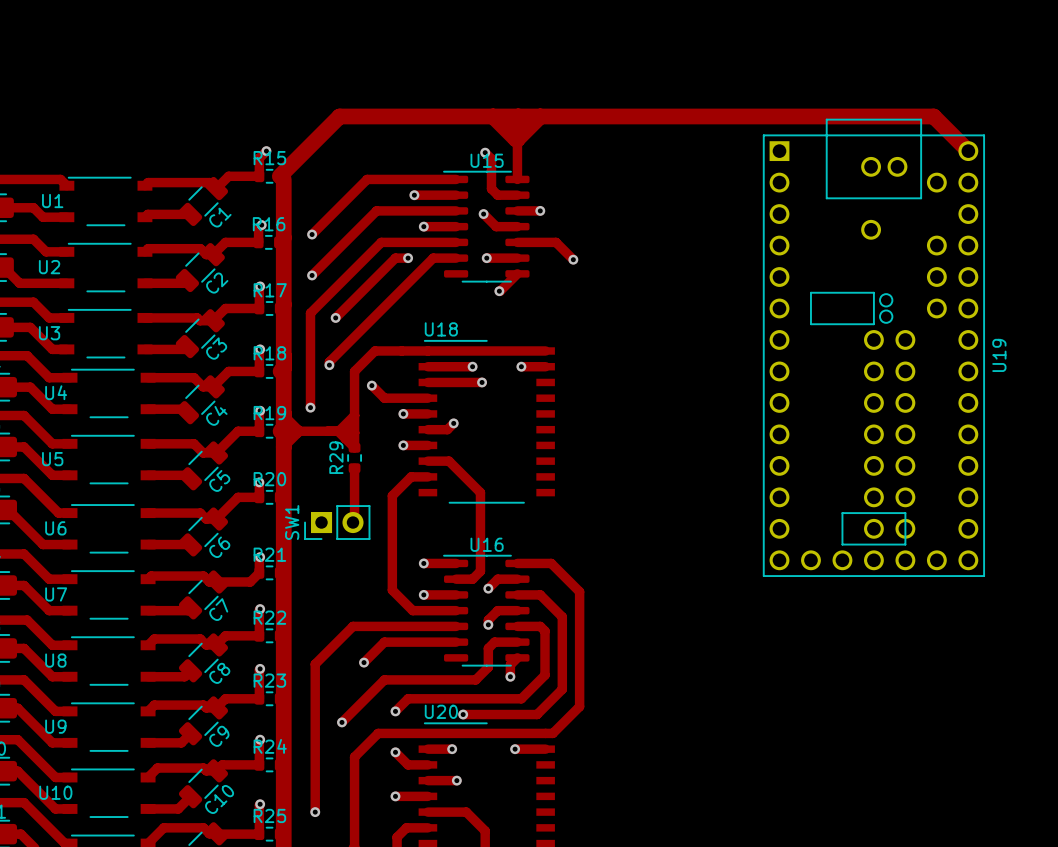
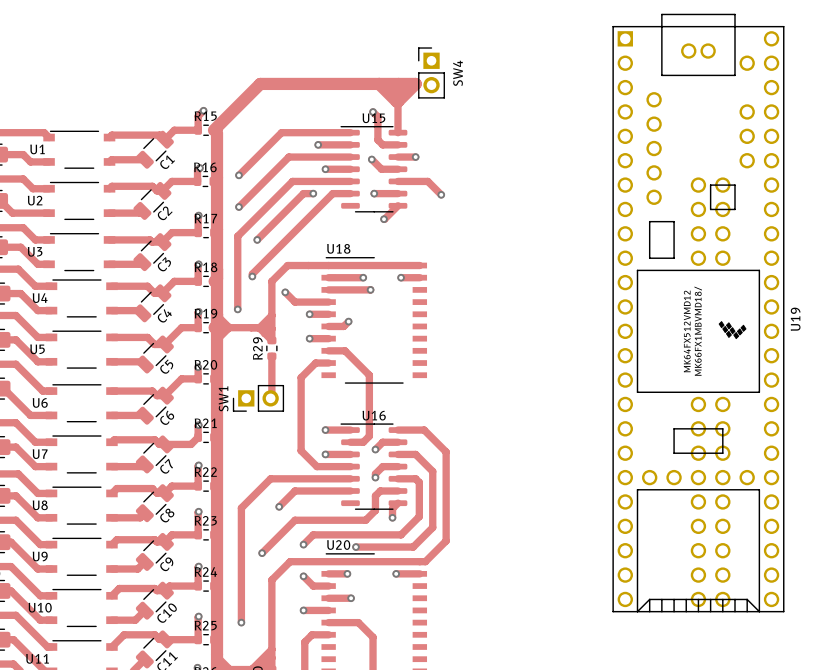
SW4: none -> (431, 72)
track: (540, 116) (933, 116) (968, 151) -> none
U19 footprint: [762, 118, 986, 577] -> [612, 13, 785, 613]

